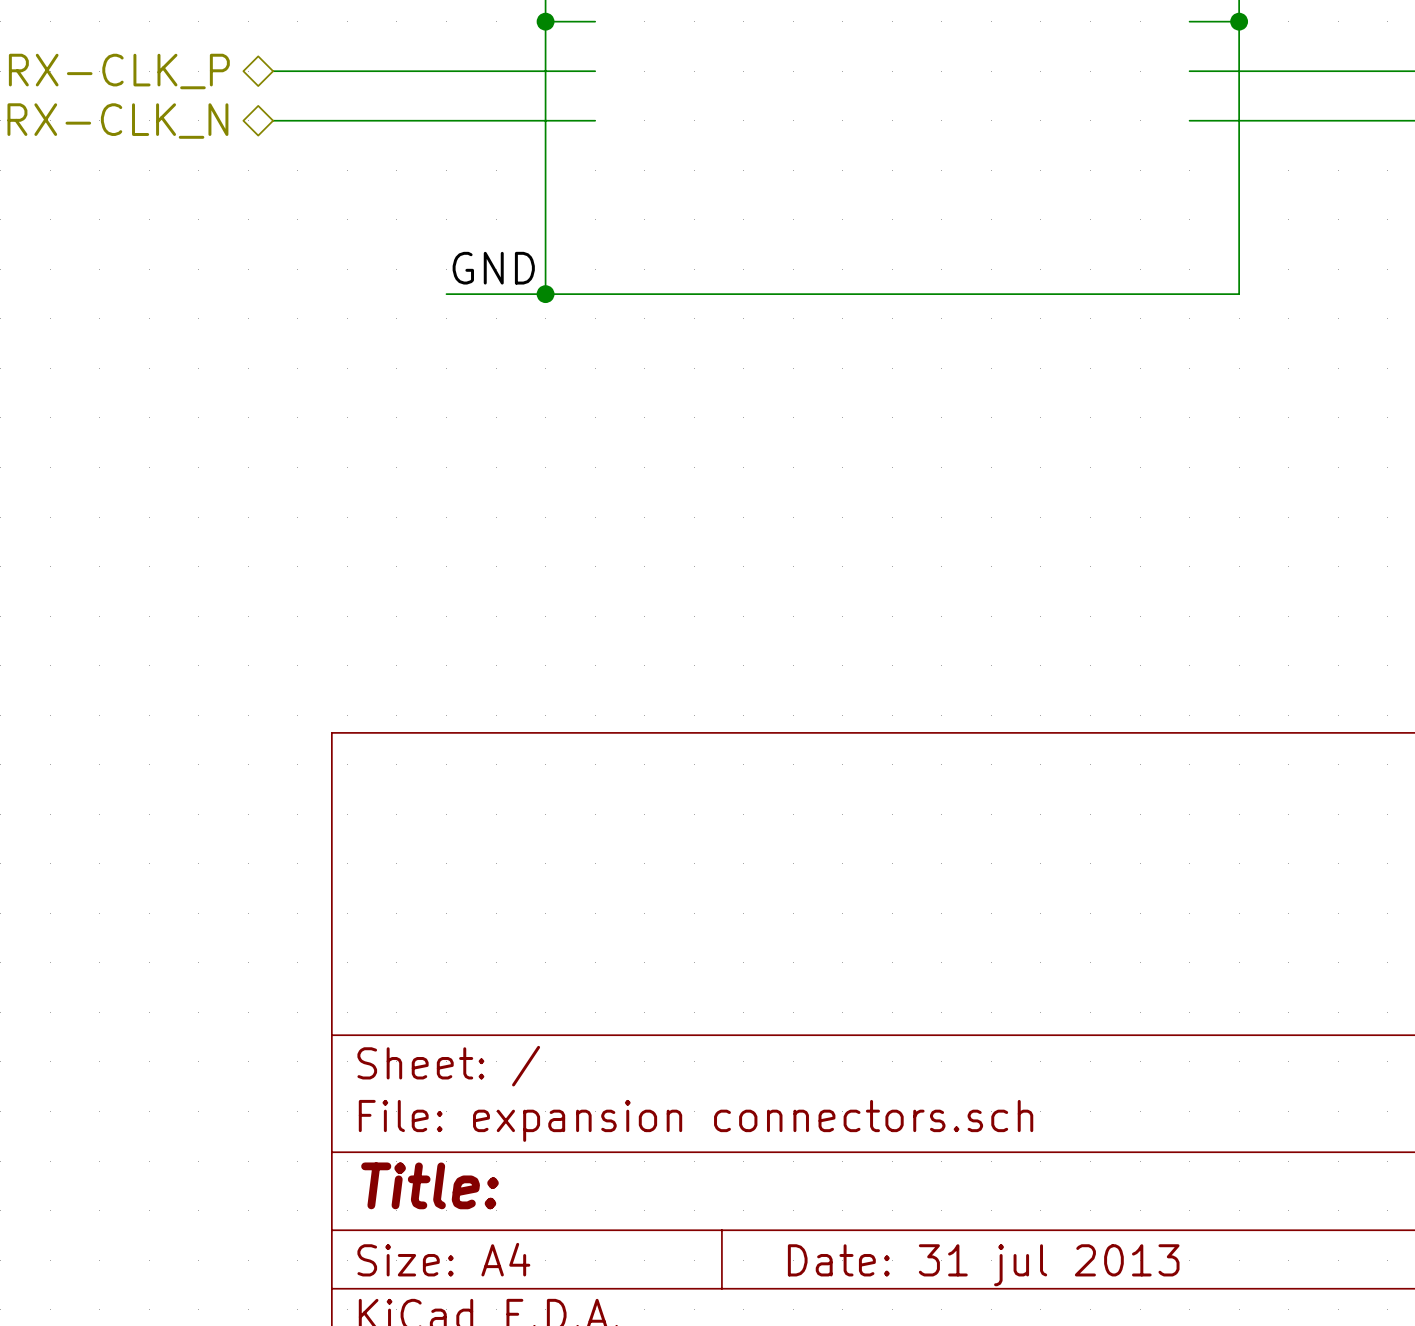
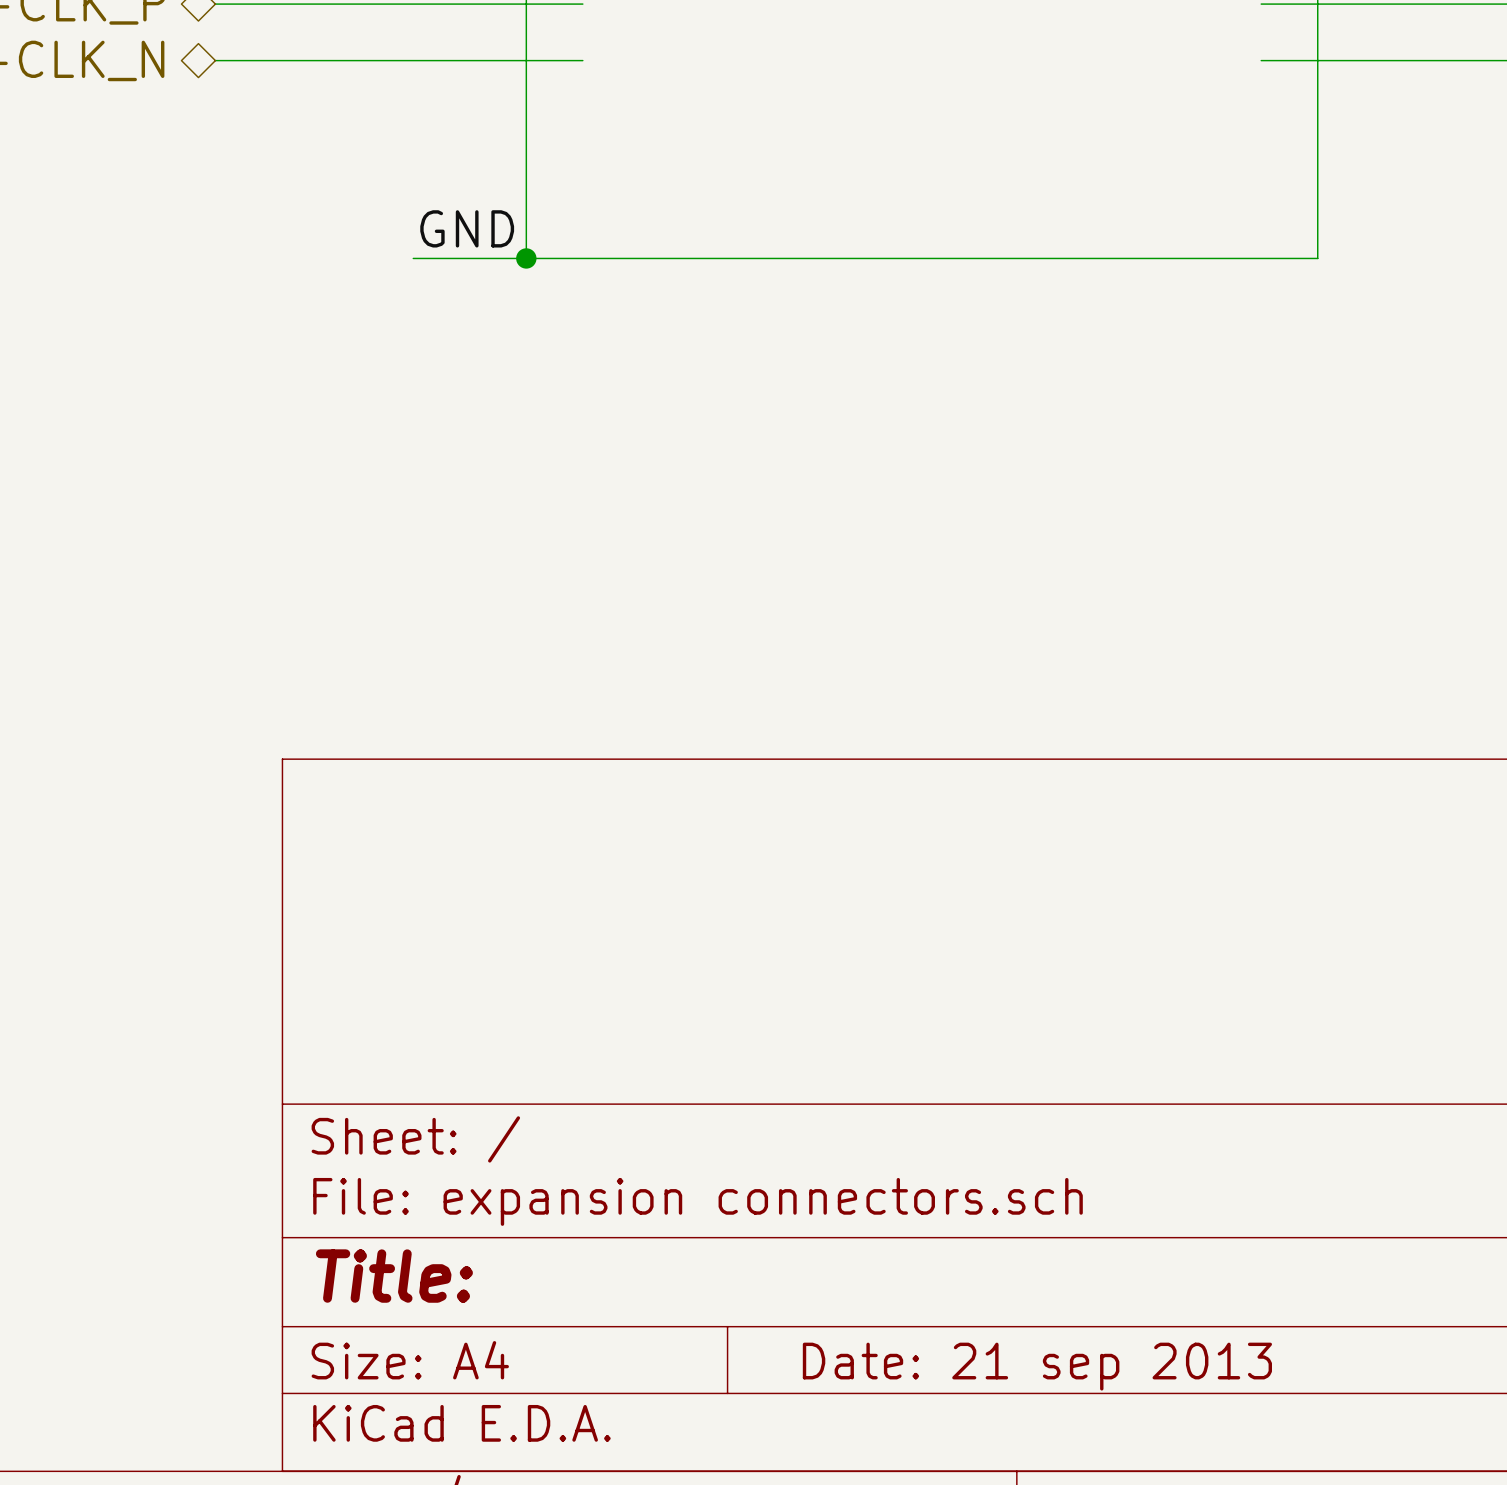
title block: Date: 31 jul 2013 (983, 1265) -> Date: 21 sep 2013 (1037, 1366)

